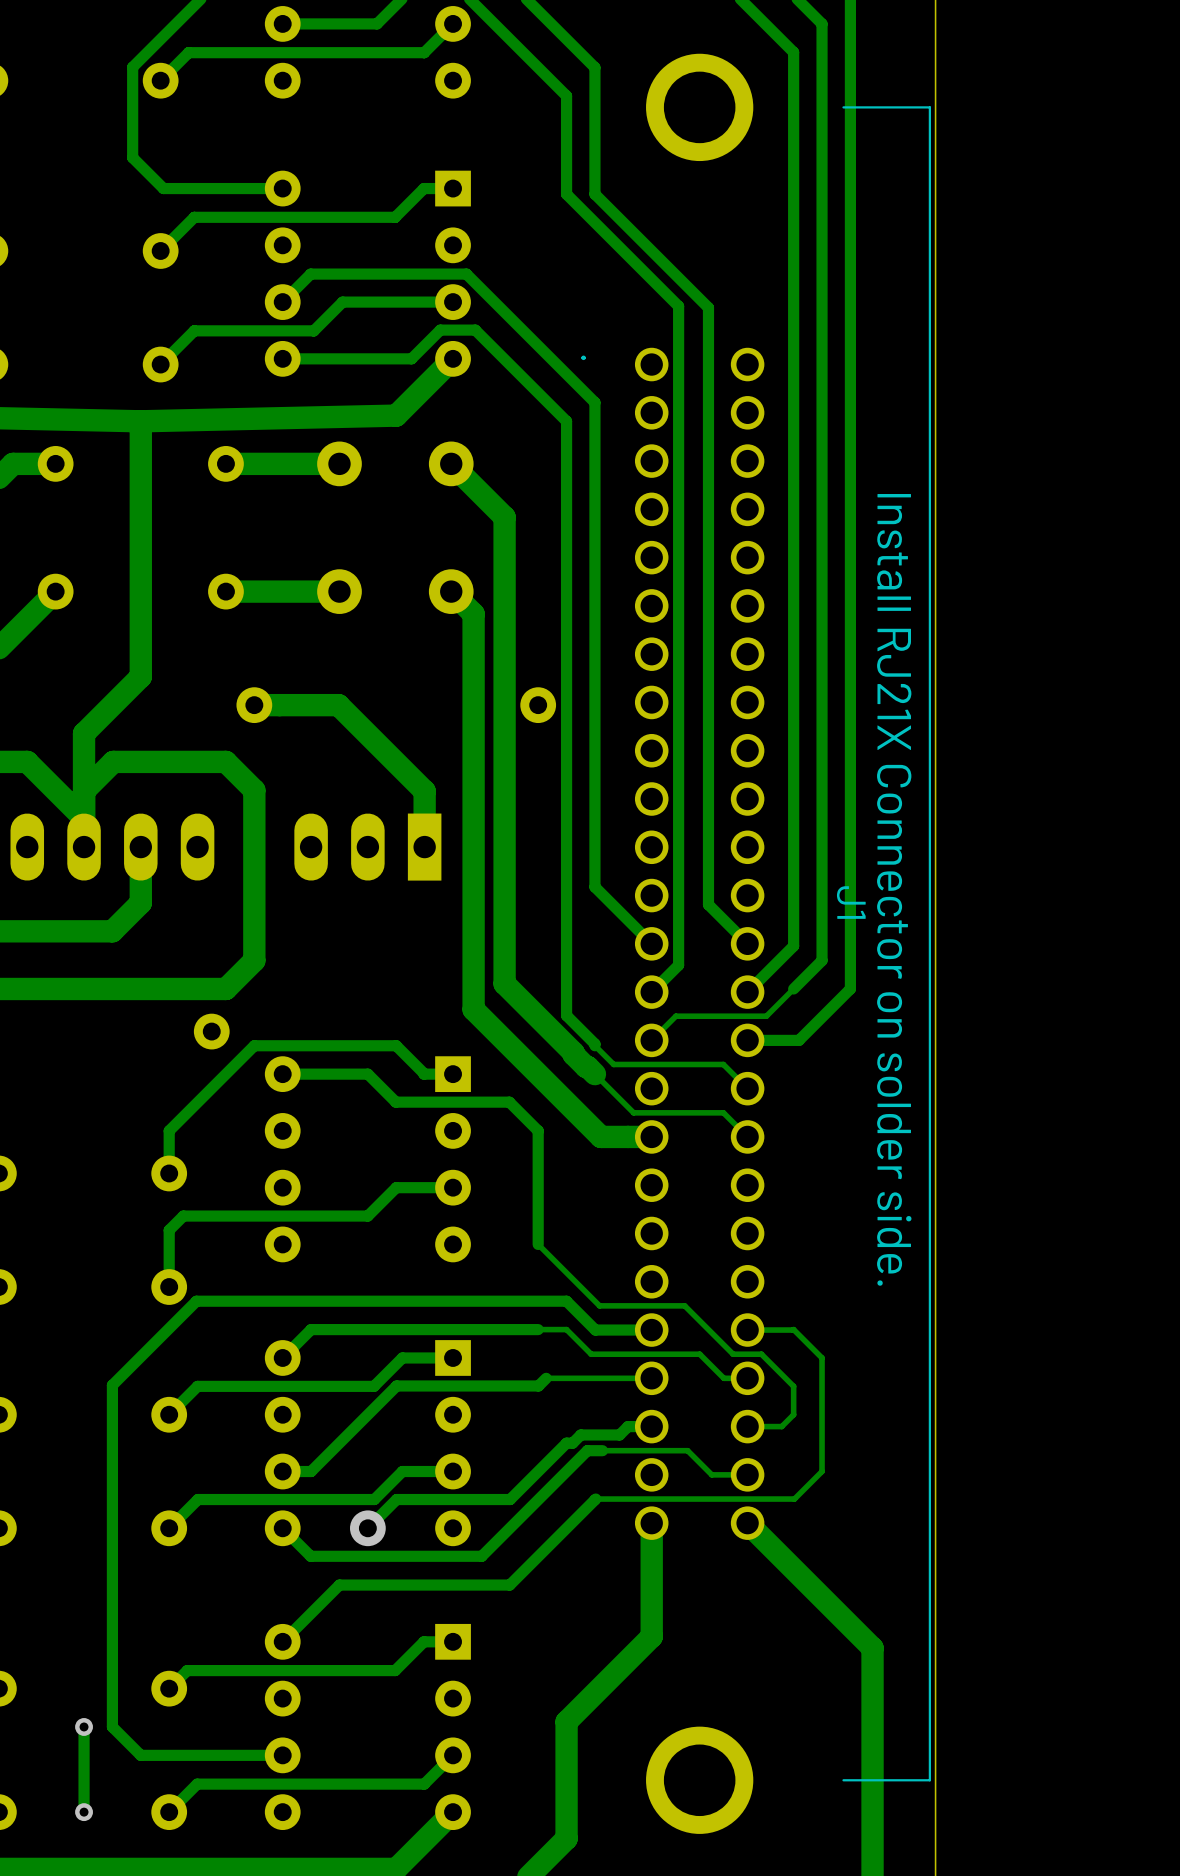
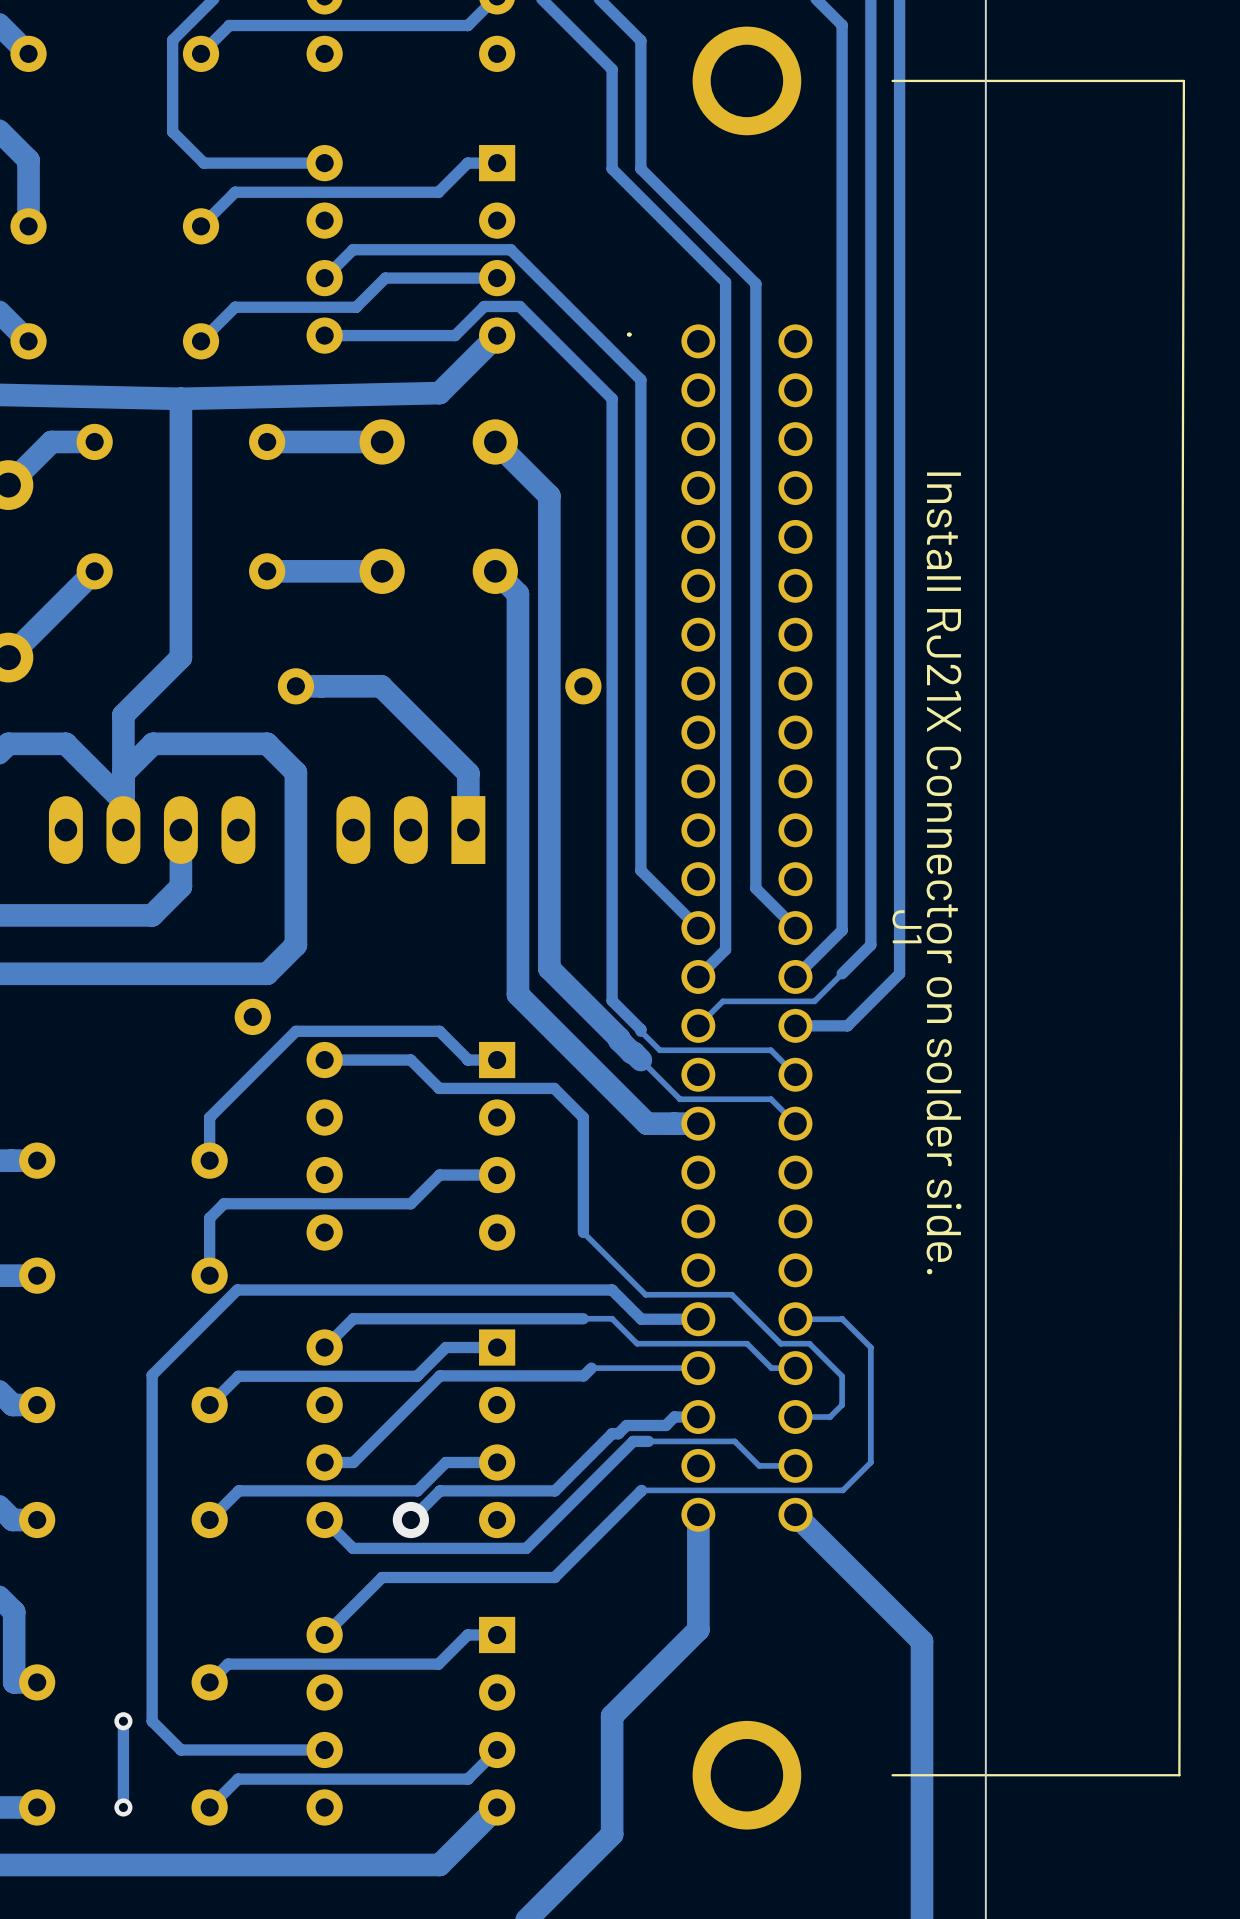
J1 footprint: [581, 53, 932, 1834] -> [627, 26, 1186, 1830]
J1 name position: J1 (851, 902) -> J1 (906, 926)

